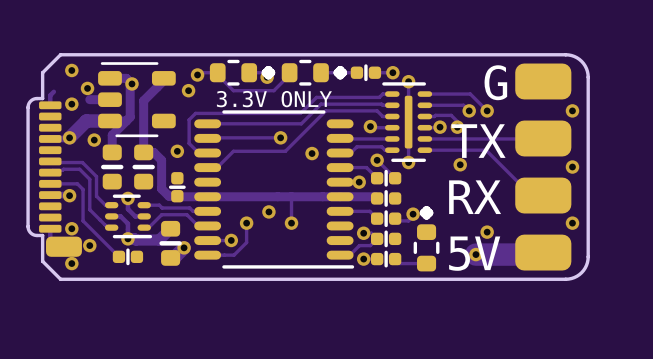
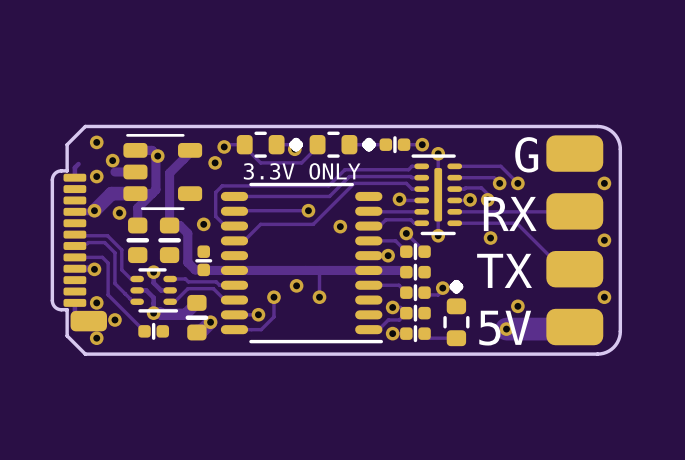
text: TX (478, 141) -> RX (510, 213)
text: RX (475, 197) -> TX (504, 270)

